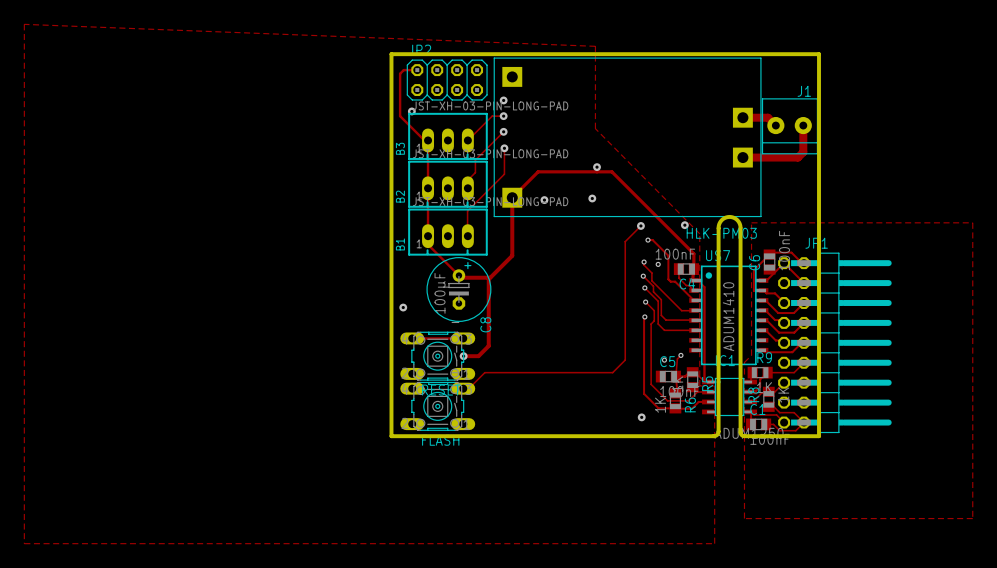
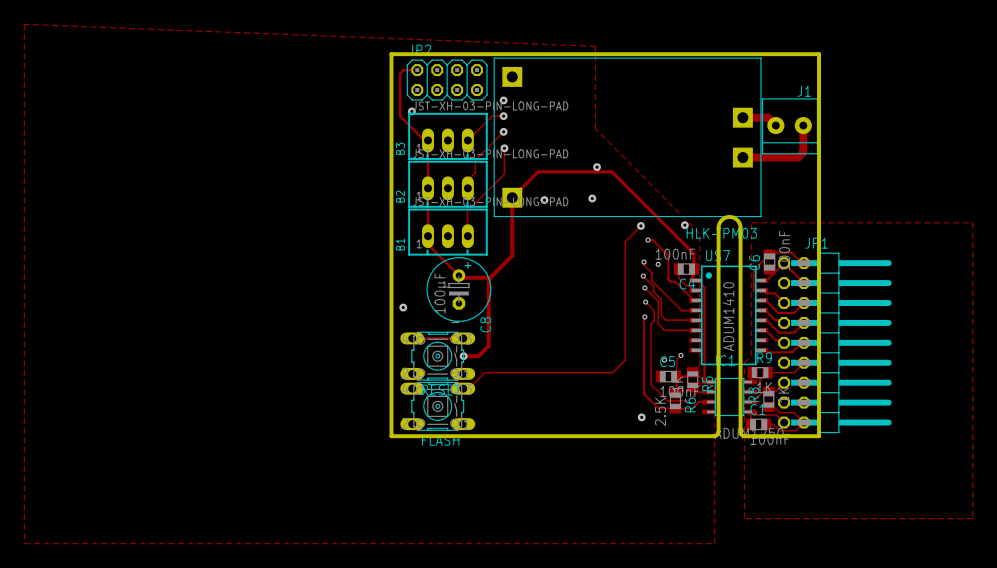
R6 value: 1K (660, 405) -> 2.5K (660, 411)

